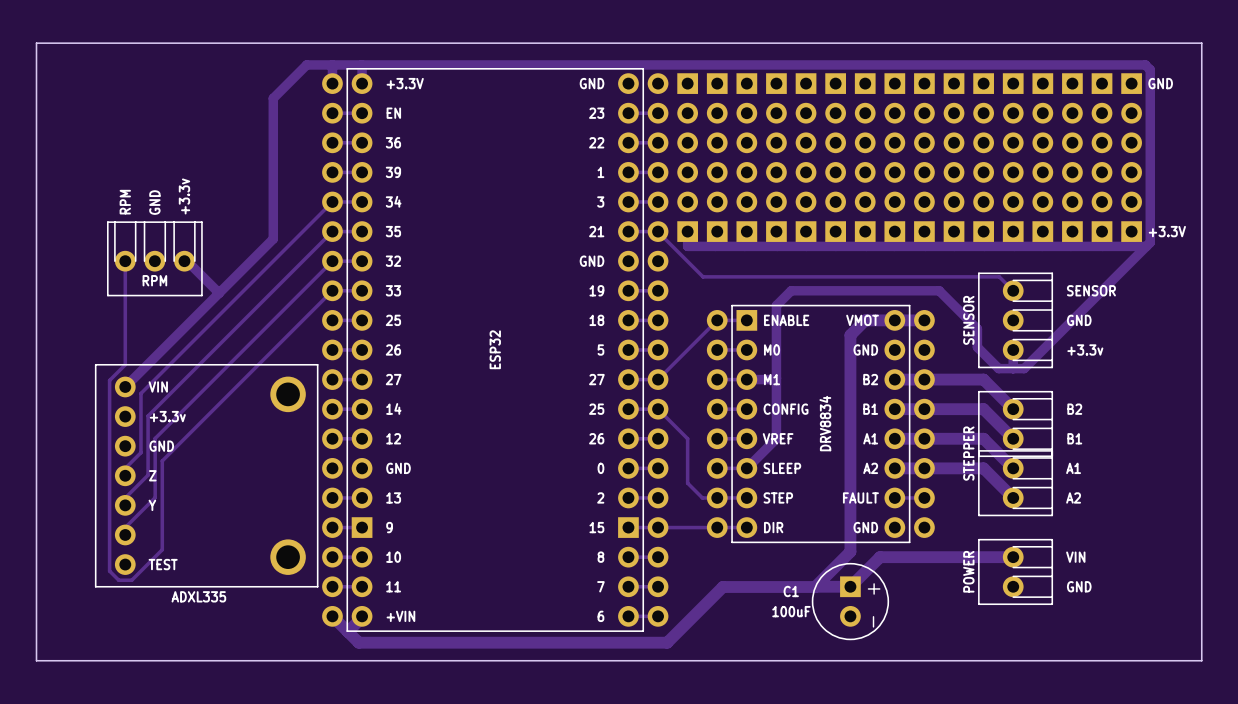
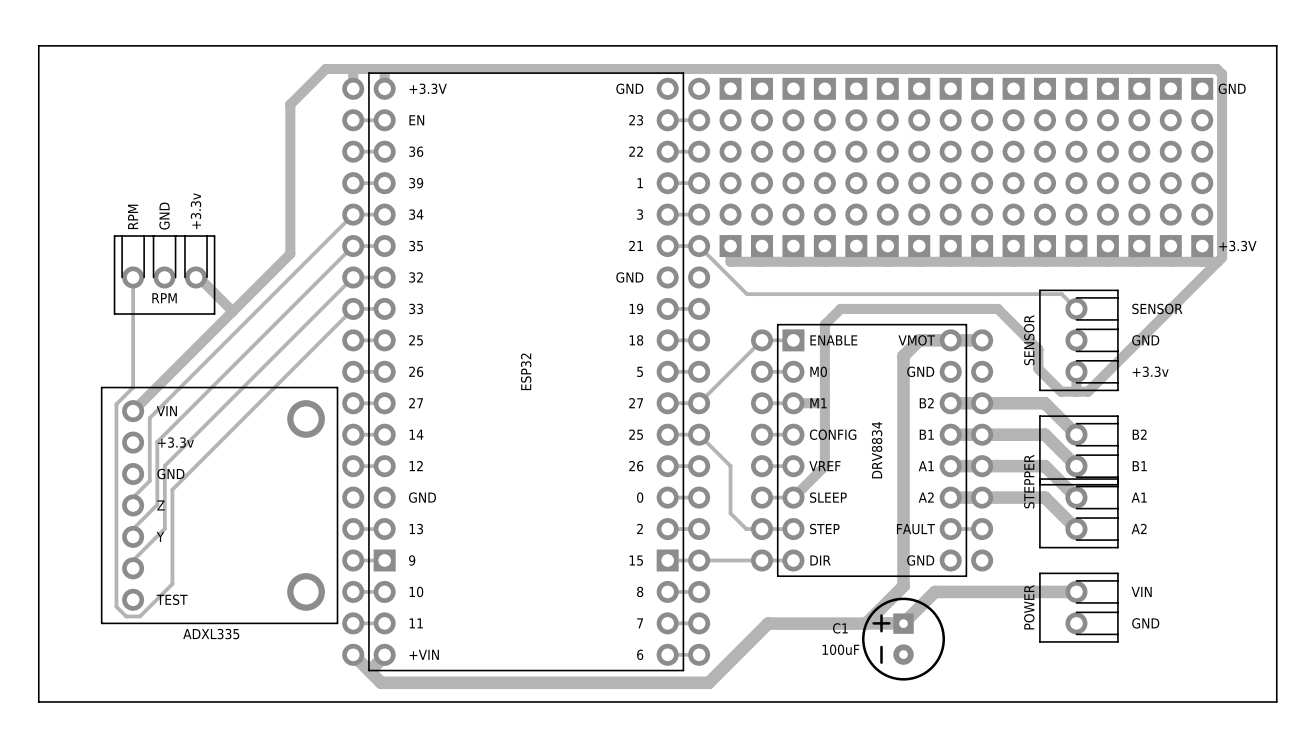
part footprint: [811, 562, 890, 641] -> [862, 597, 946, 681]

